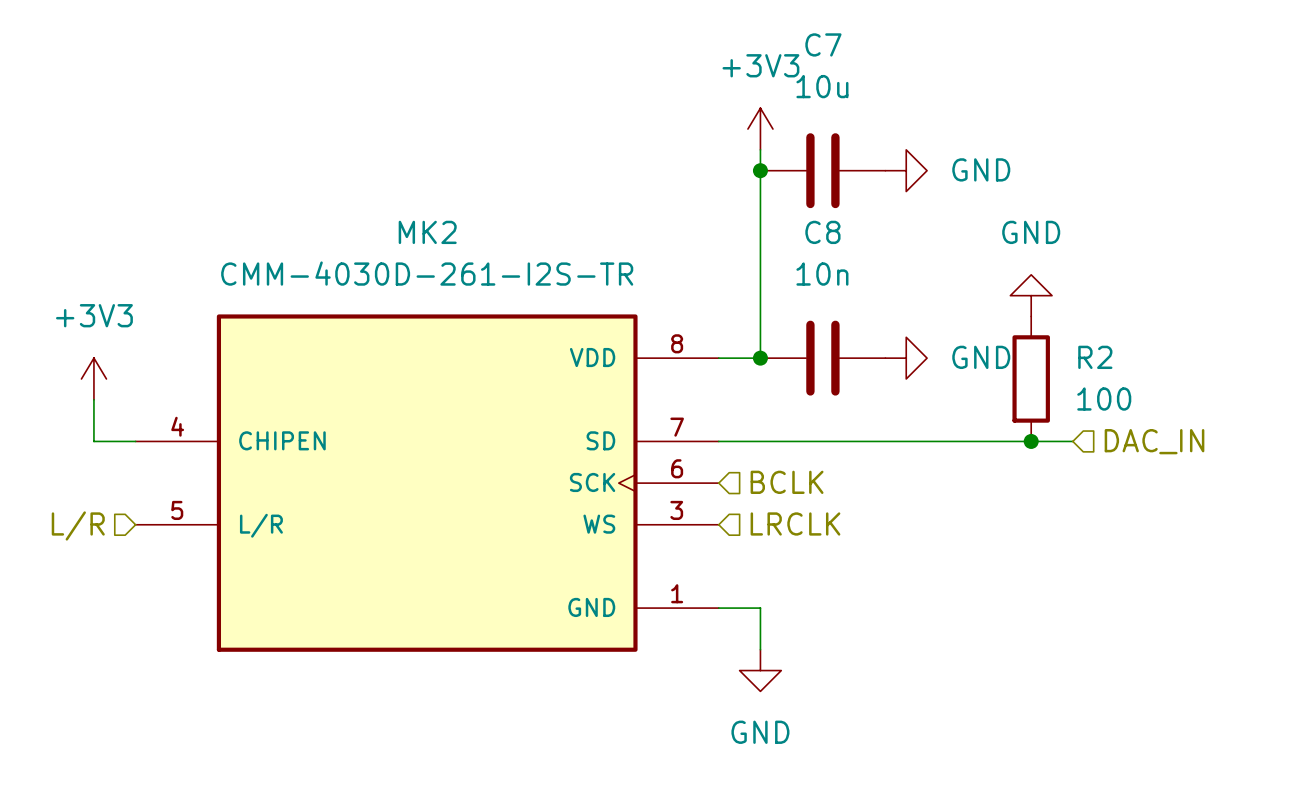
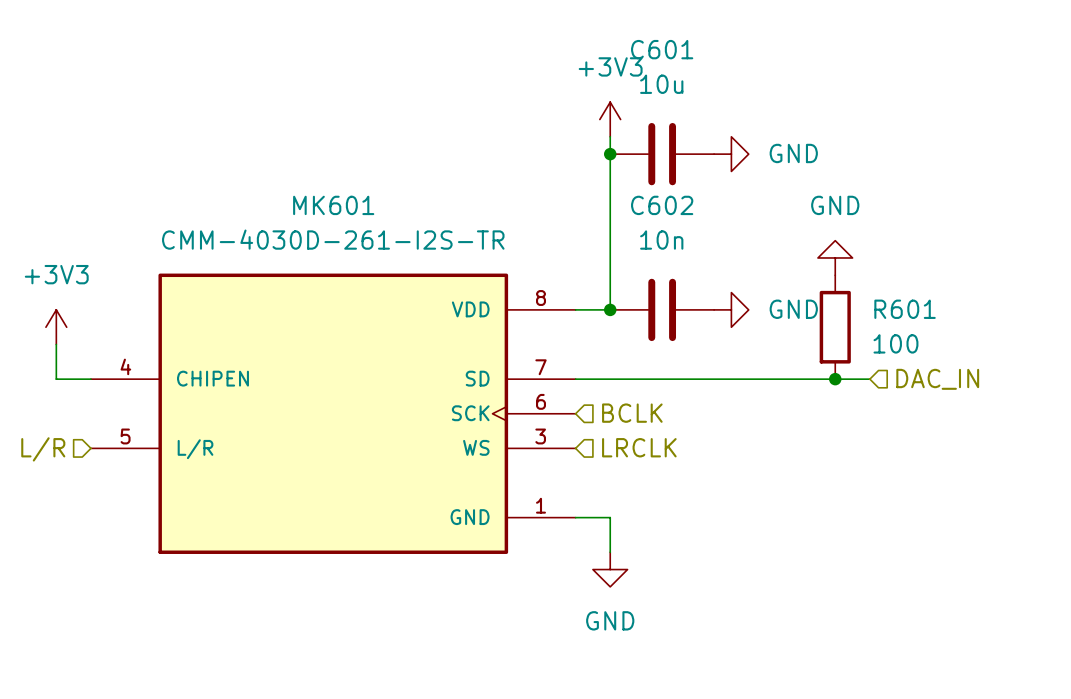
C7 name: C7 (823, 44) -> C601 (662, 49)
MK2 name: MK2 (427, 232) -> MK601 (333, 205)
C8 name: C8 (822, 232) -> C602 (662, 205)
R2 name: R2 (1095, 357) -> R601 (905, 309)

